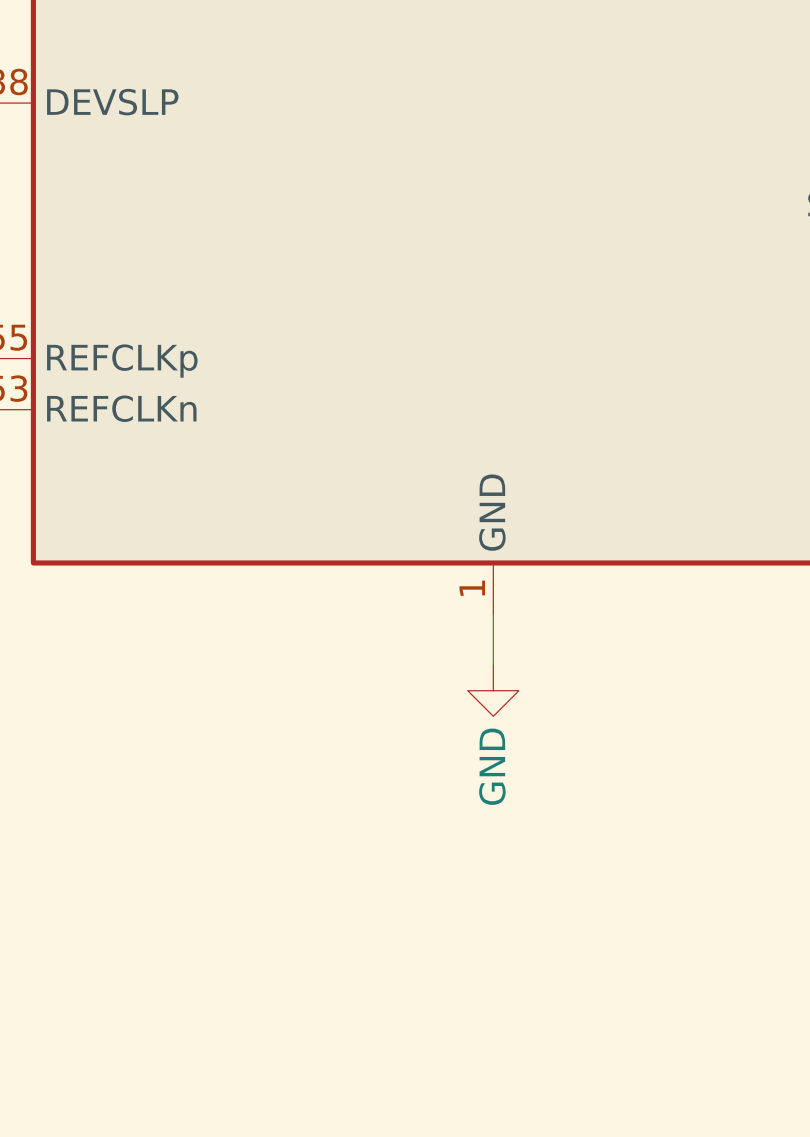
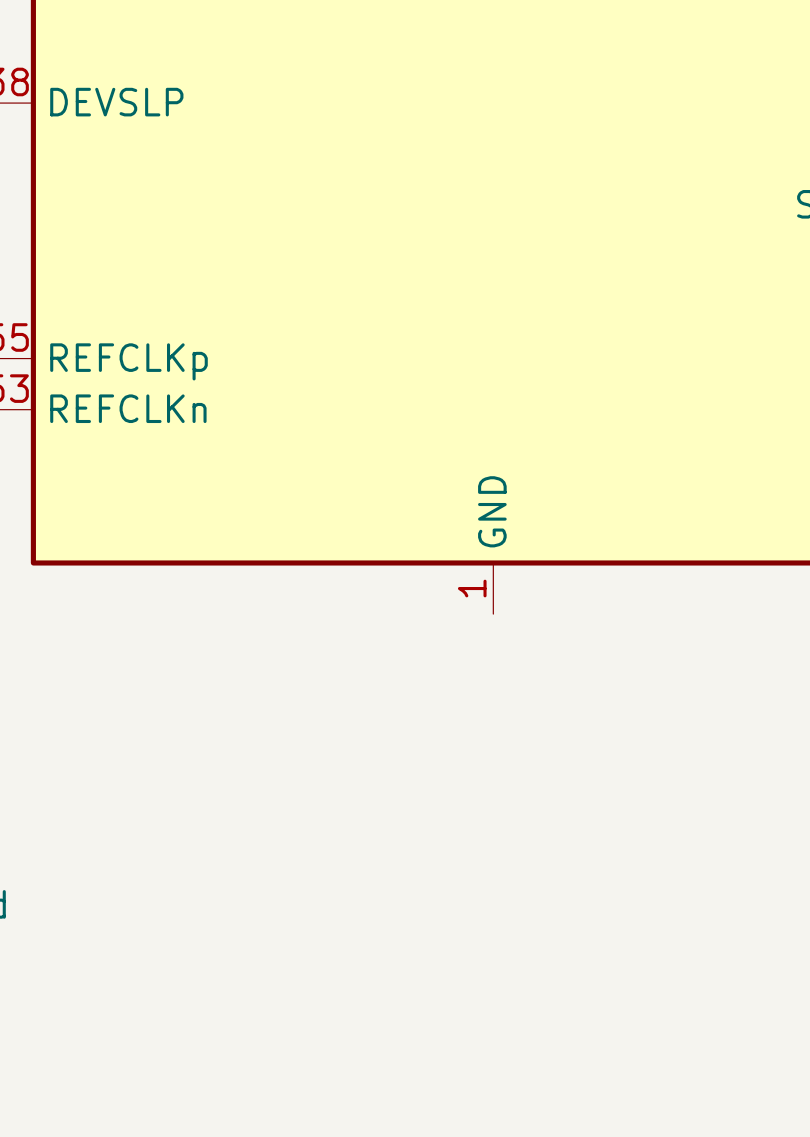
wire: (493, 614) (493, 665) -> none
power symbol: GND (493, 690) -> none

